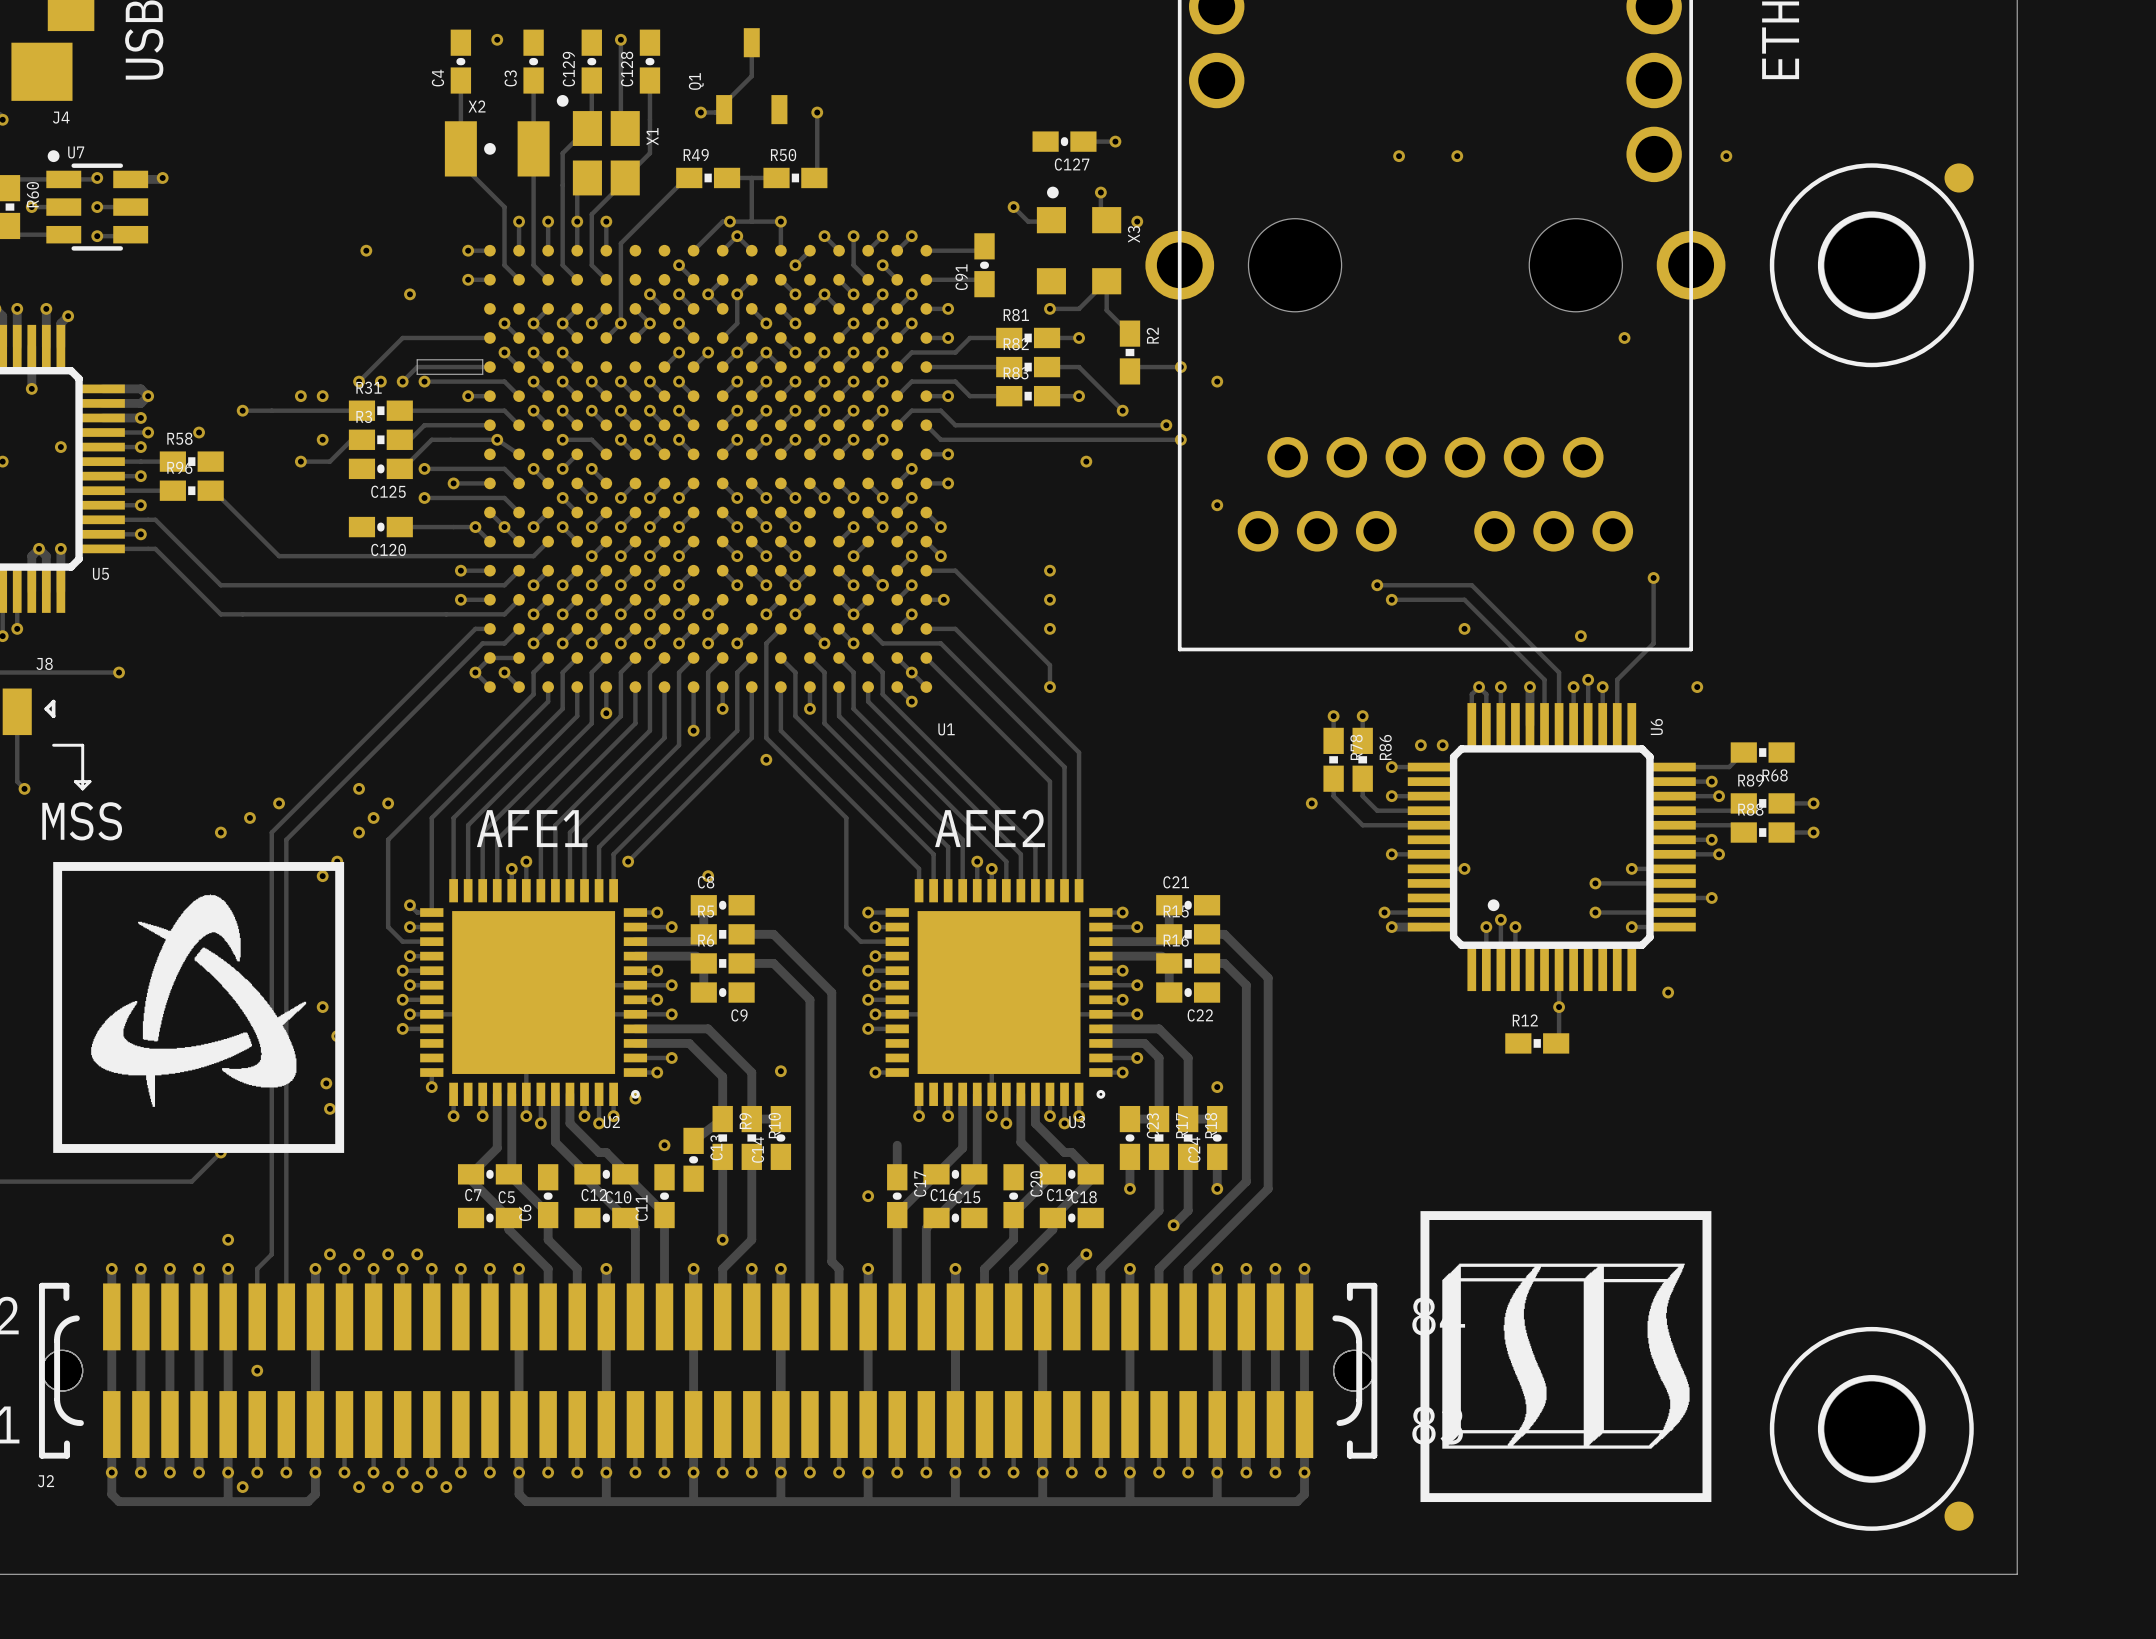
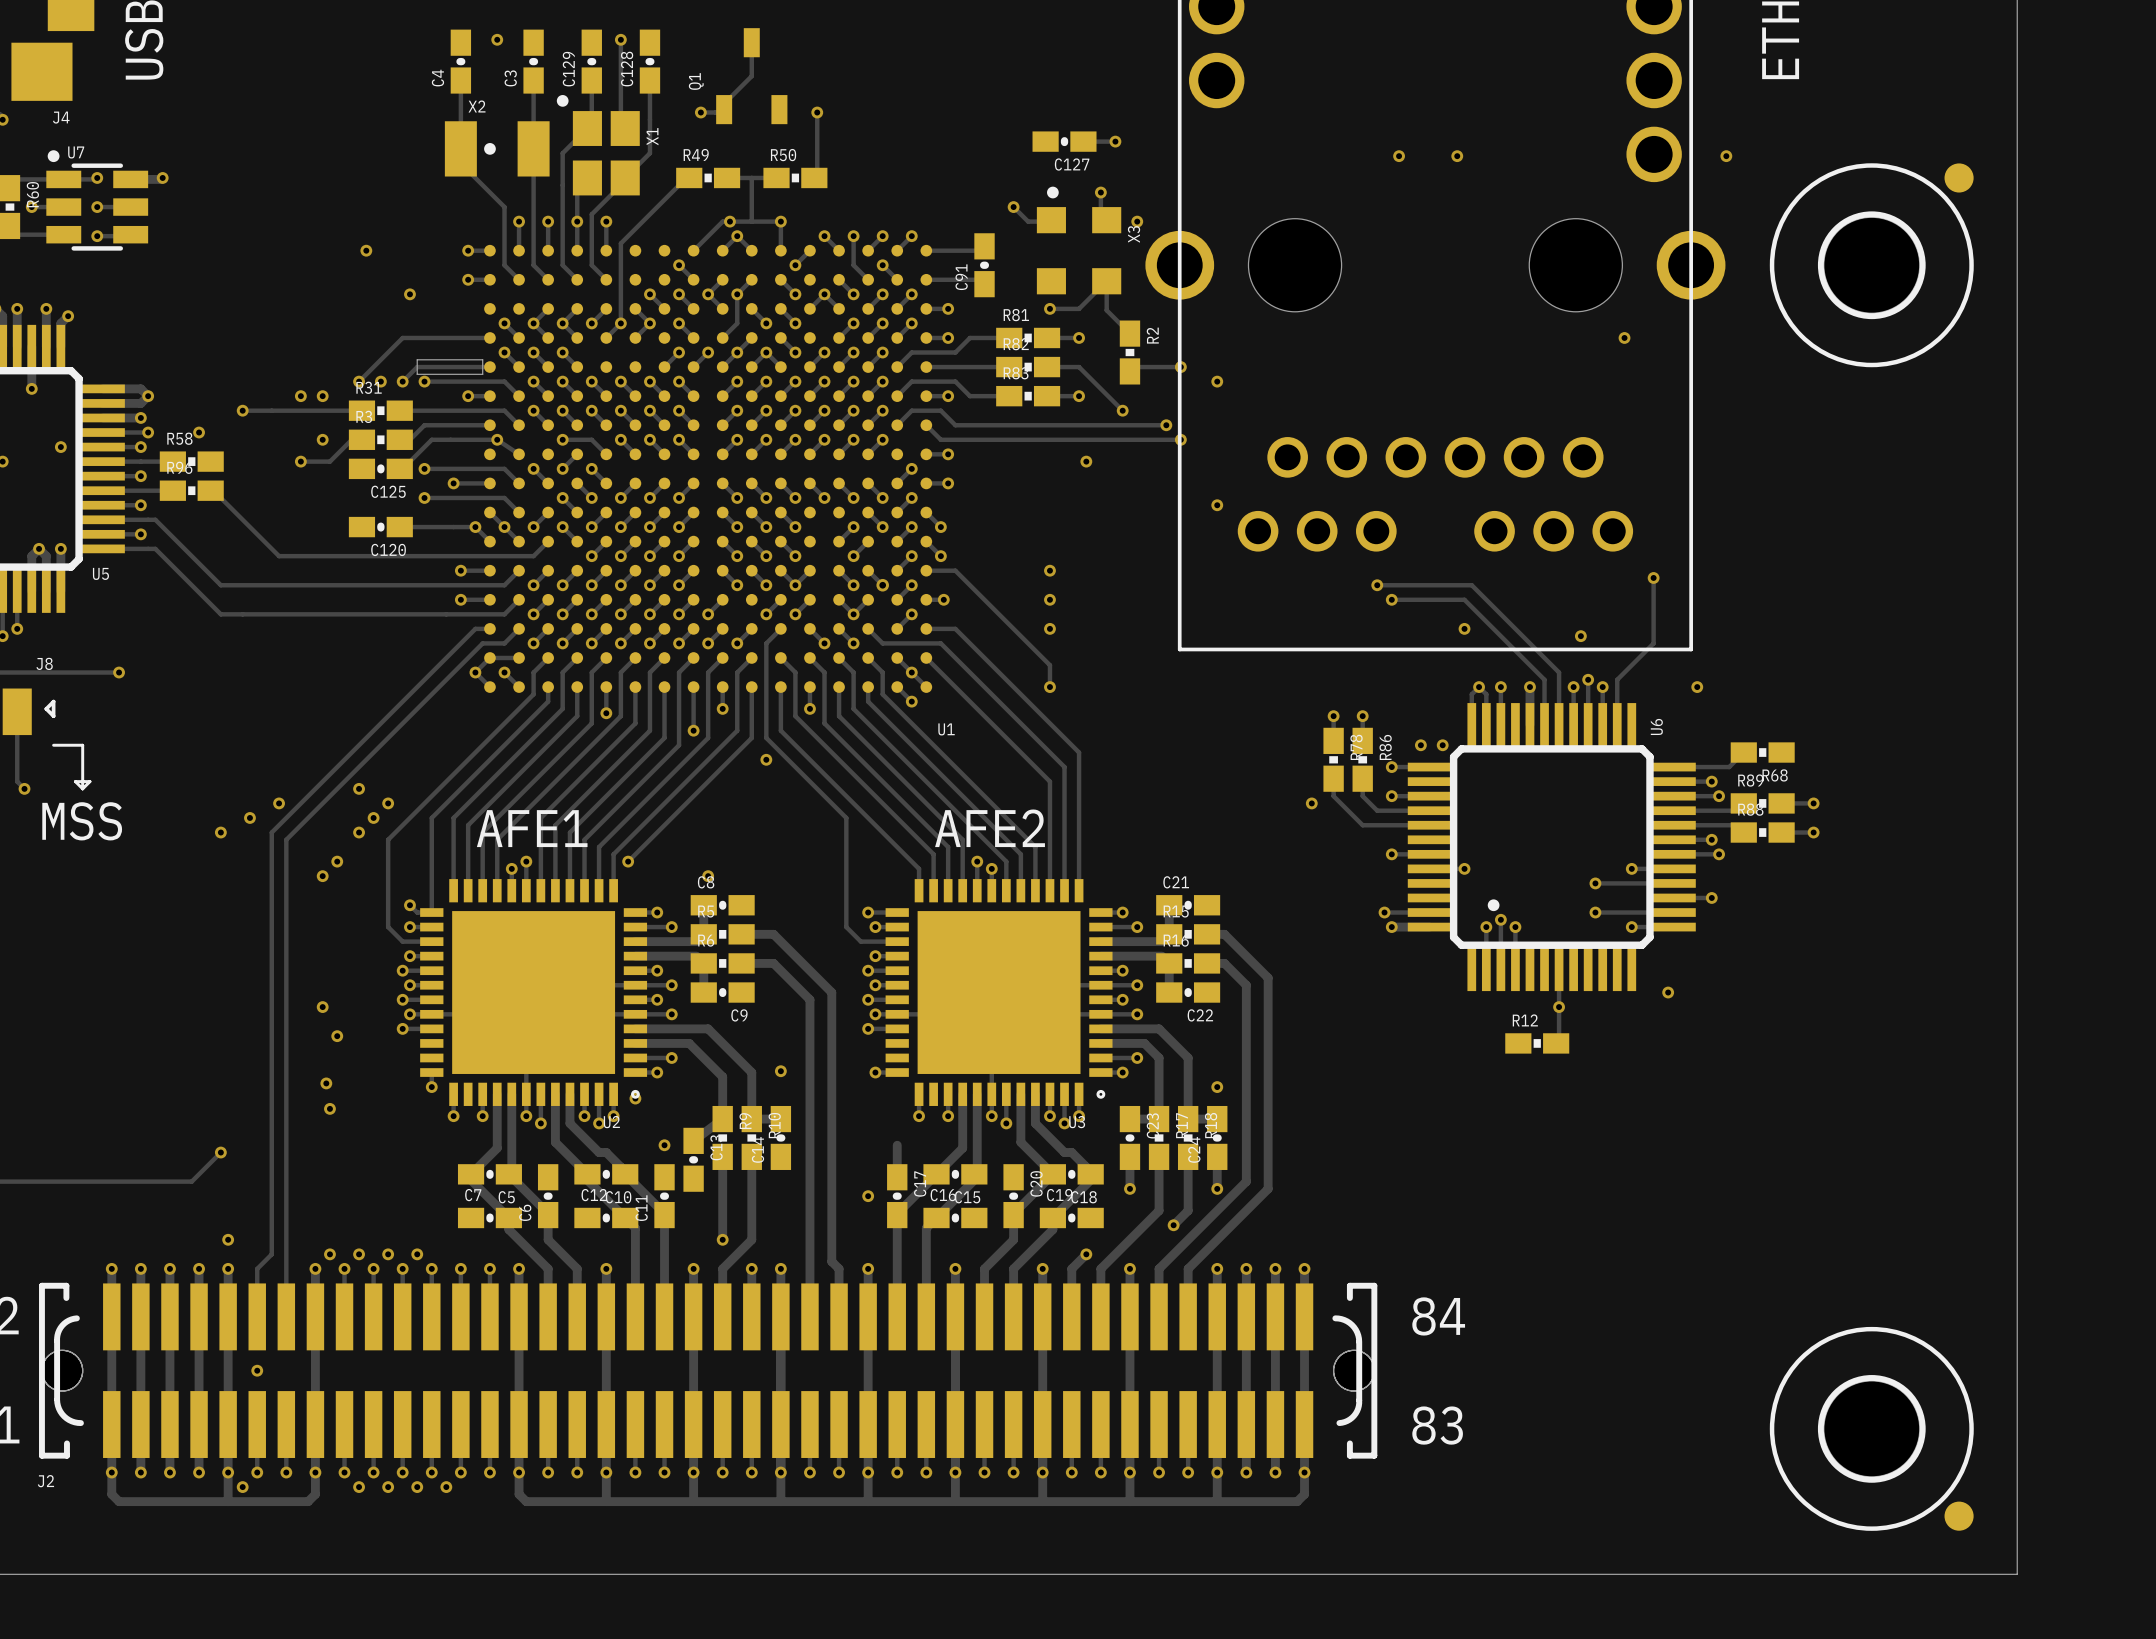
drawing: [53, 862, 345, 1153] -> none
drawing: [1420, 1211, 1712, 1503] -> none

